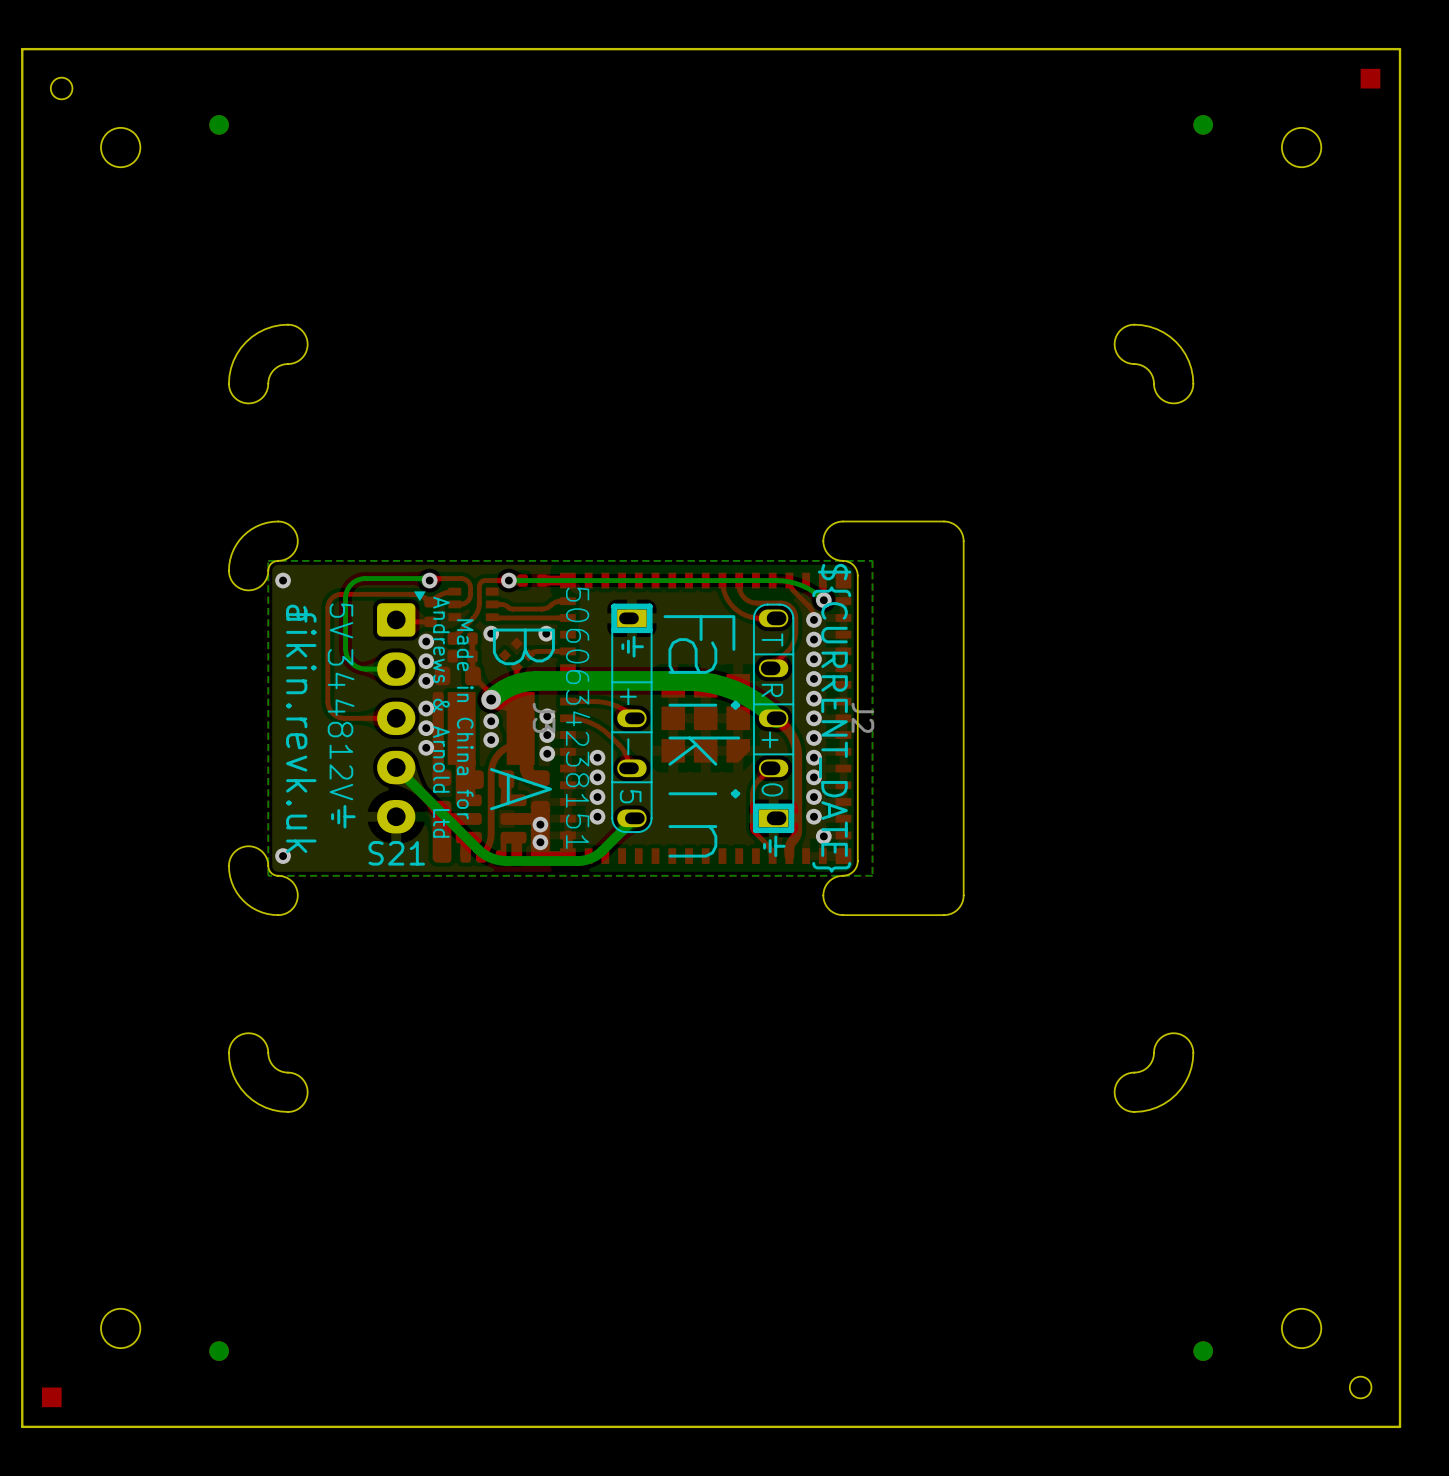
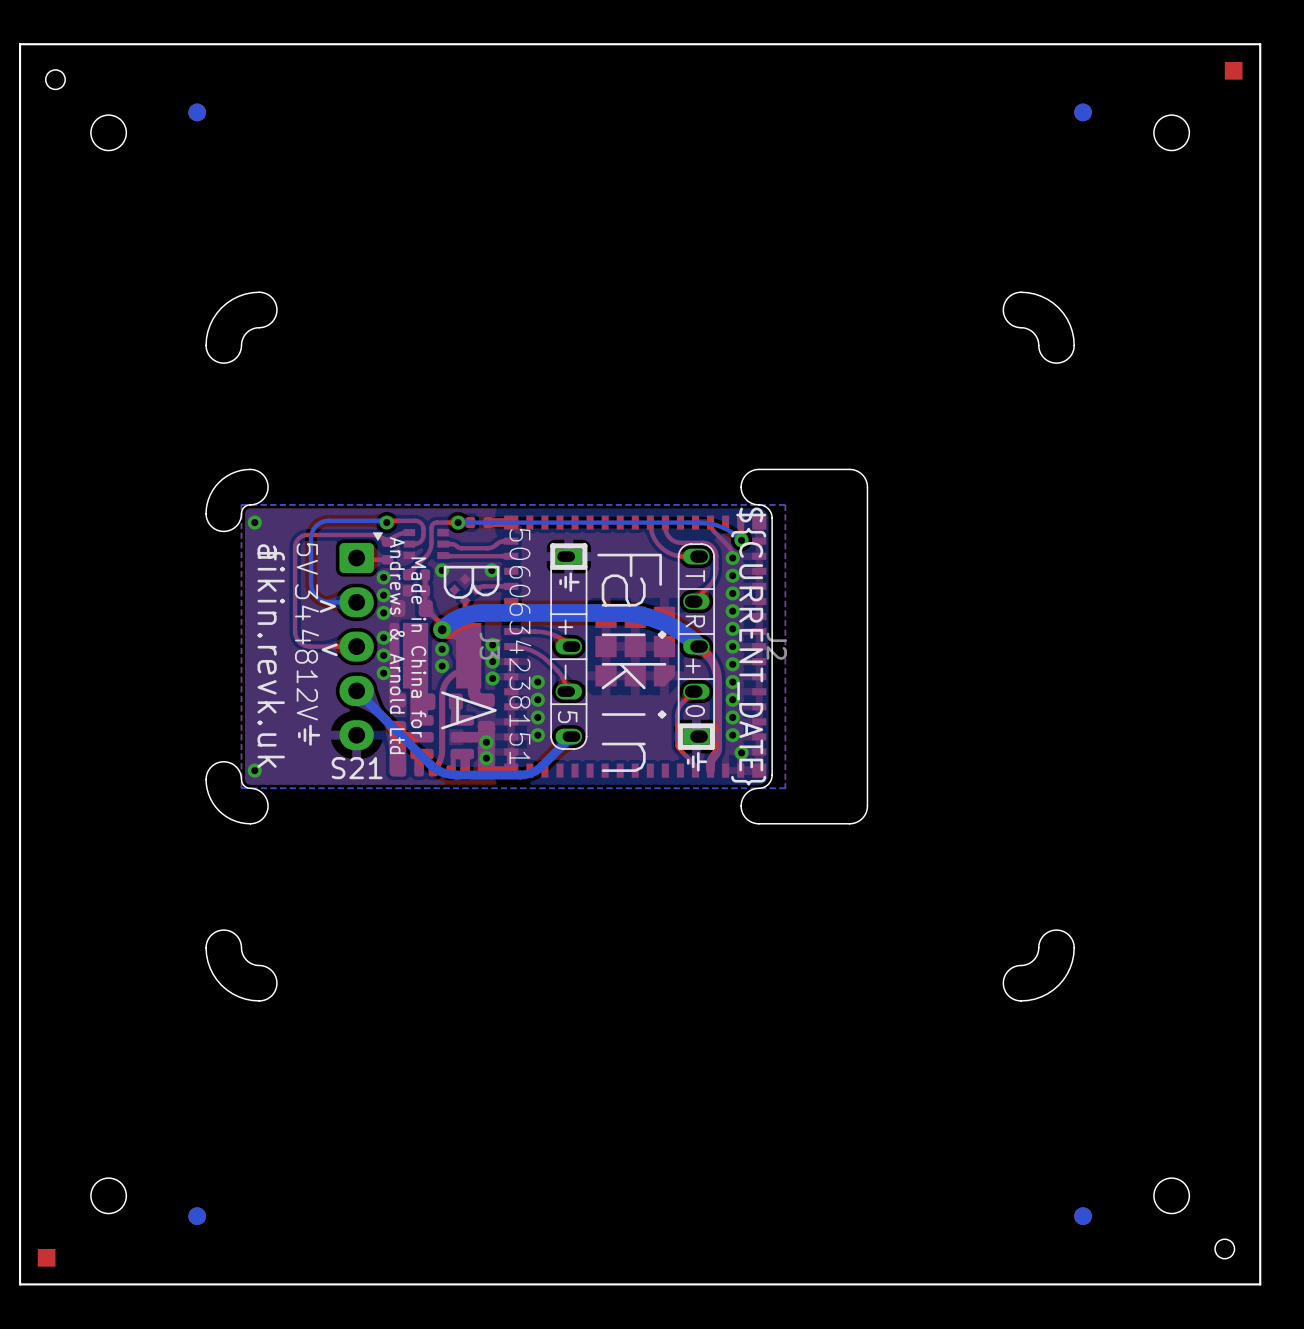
text: none -> > (327, 606)
text: none -> < (329, 649)

